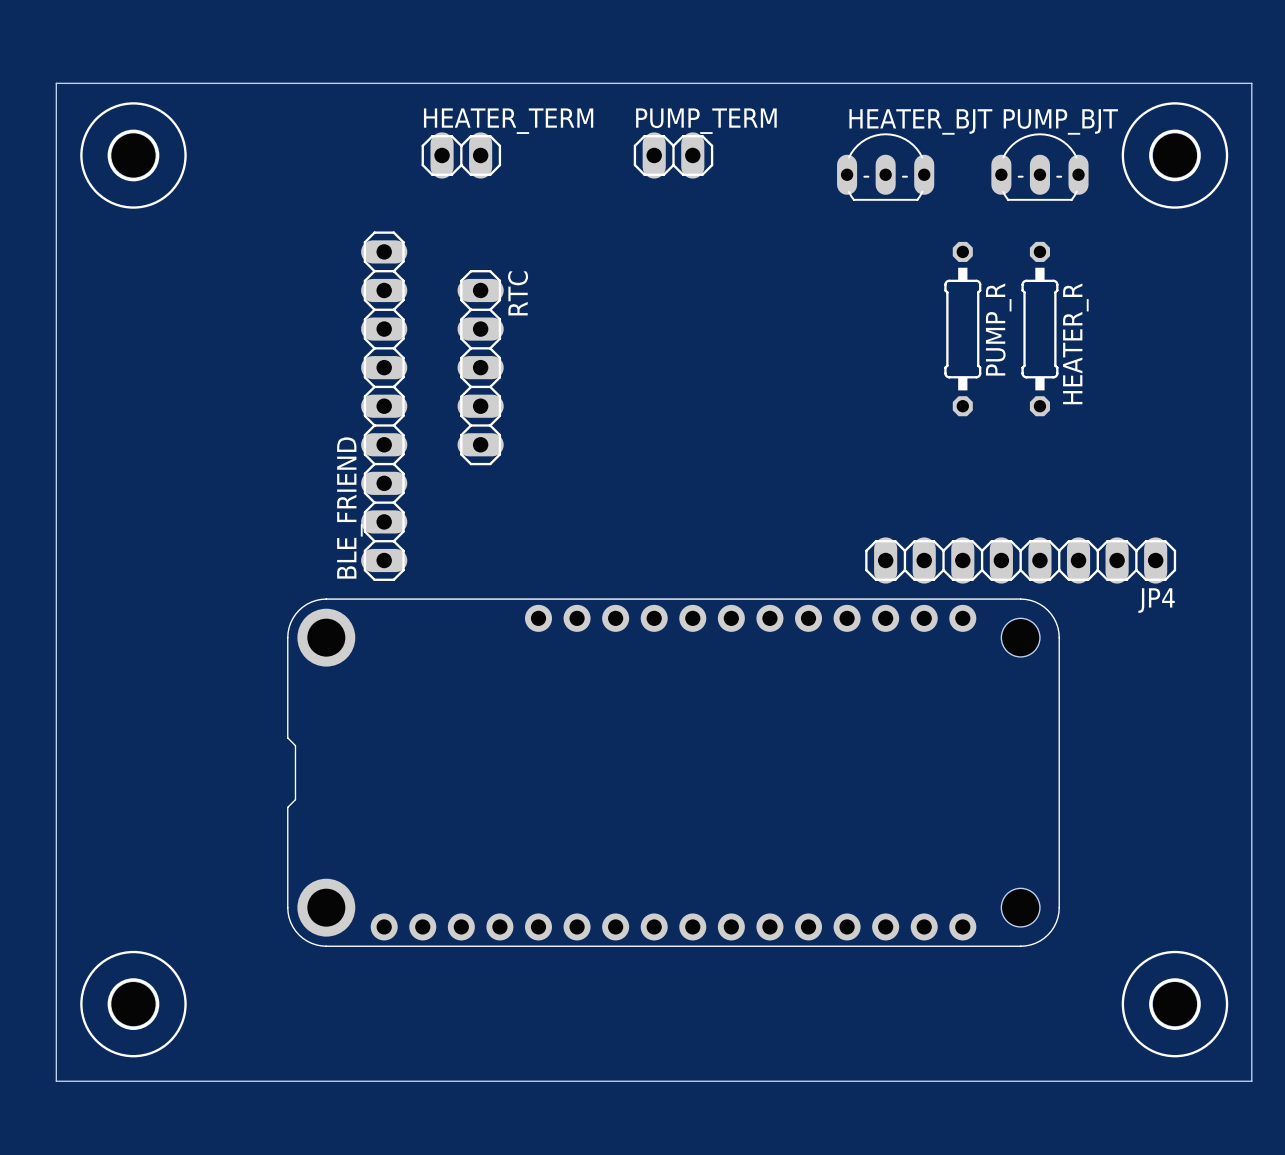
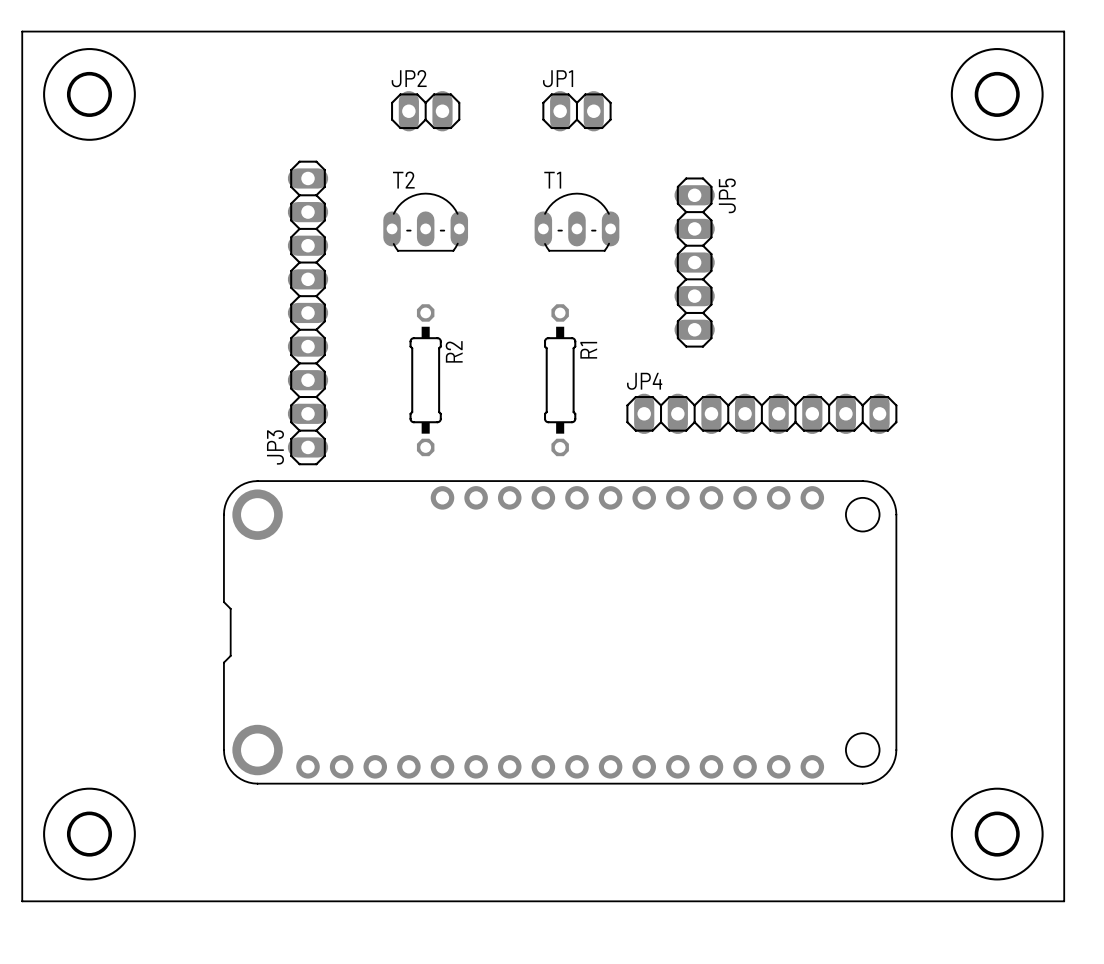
HEATER_TERM: (461, 155) -> none
PUMP_TERM: (673, 155) -> none
HEATER_BJT: (885, 167) -> none
PUMP_BJT: (1039, 167) -> none
JP2: none -> (425, 111)
JP1: none -> (576, 111)
T2: none -> (425, 222)
T1: none -> (576, 222)
PUMP_R: (962, 329) -> none
HEATER_R: (1039, 329) -> none
JP5: none -> (694, 262)
RTC: (480, 367) -> none
R2: none -> (425, 380)
R1: none -> (560, 380)
BLE_FRIEND name: BLE_FRIEND (349, 507) -> JP3 (275, 447)
JP4 position: (1020, 560) -> (761, 413)
JP4 name position: JP4 (1156, 600) -> JP4 (644, 381)

